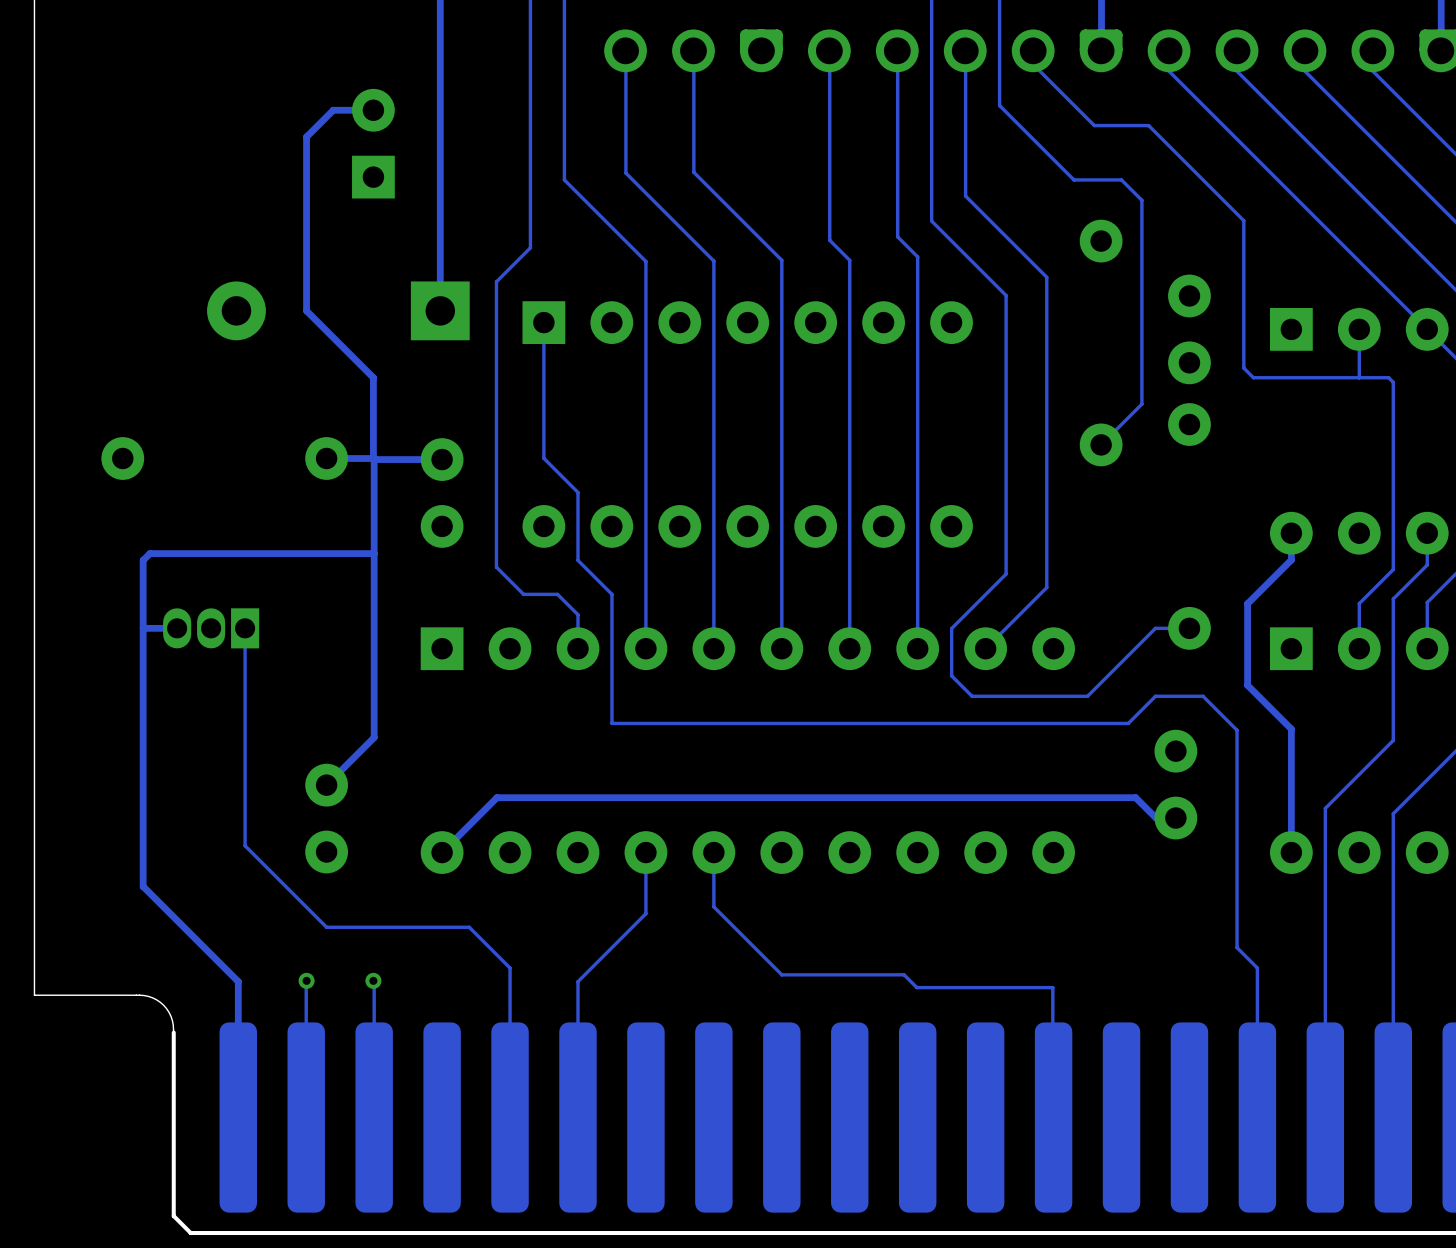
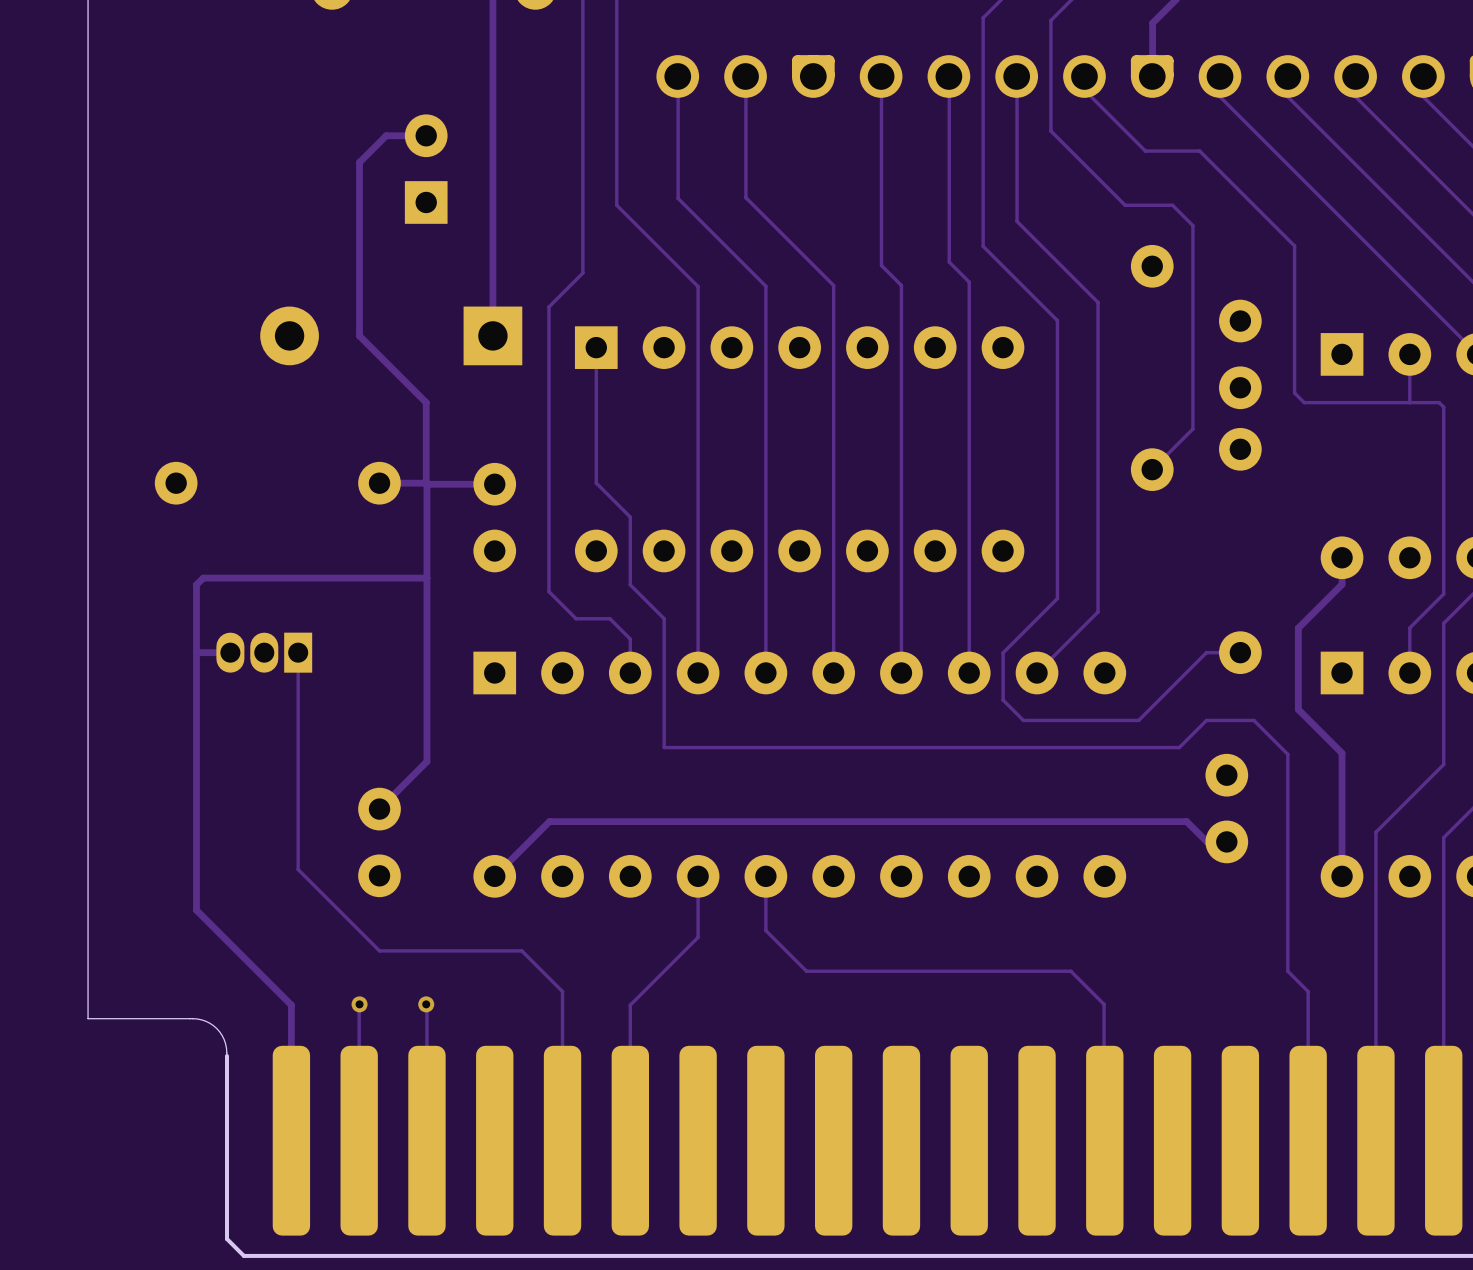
track: (754, 947) (781, 974) (904, 974) (916, 987) (1052, 987) -> (806, 971) (1070, 971) (1104, 1004) (1104, 1011)

